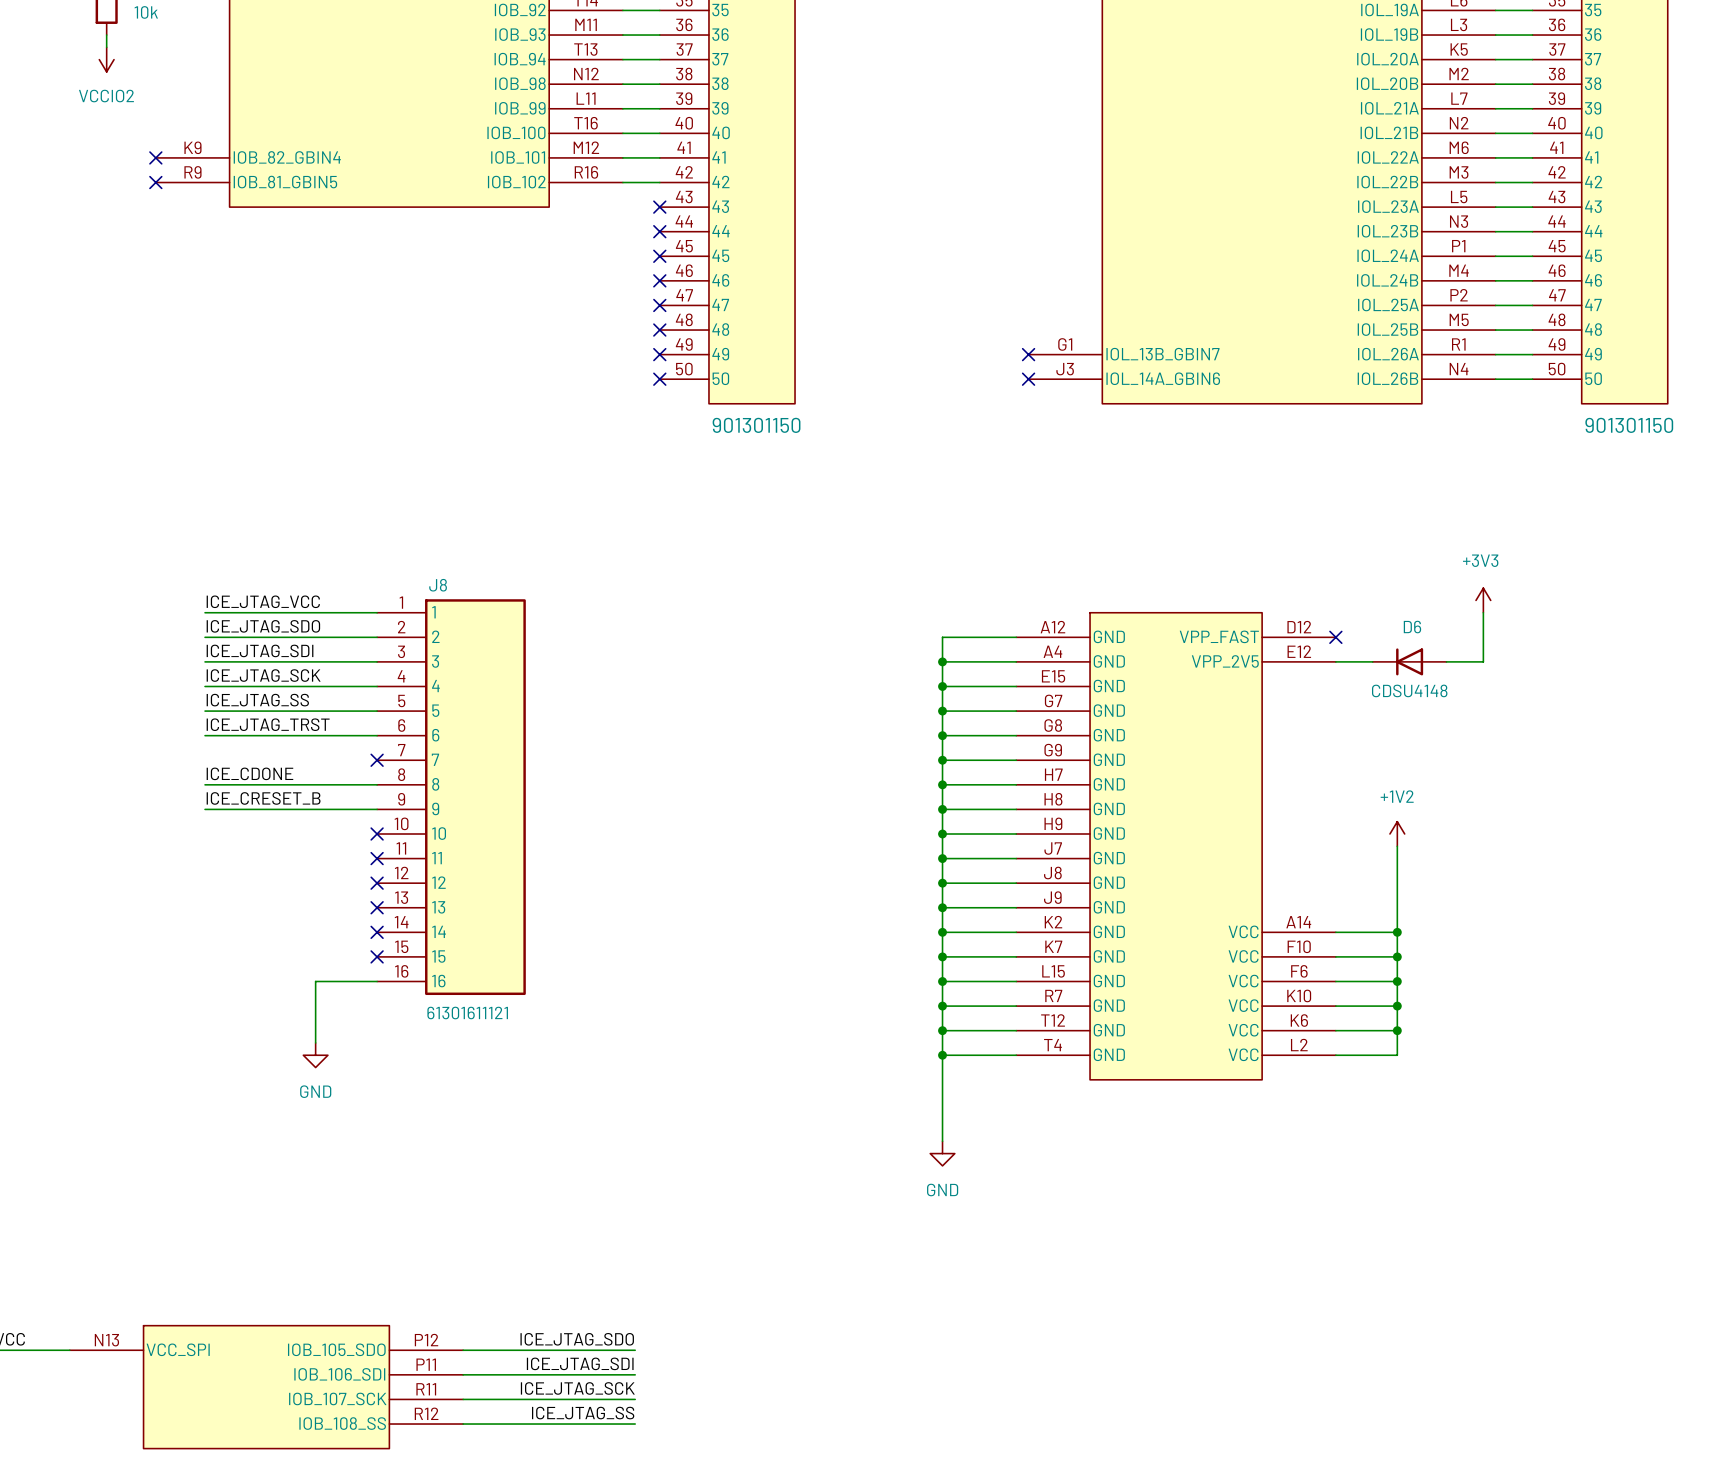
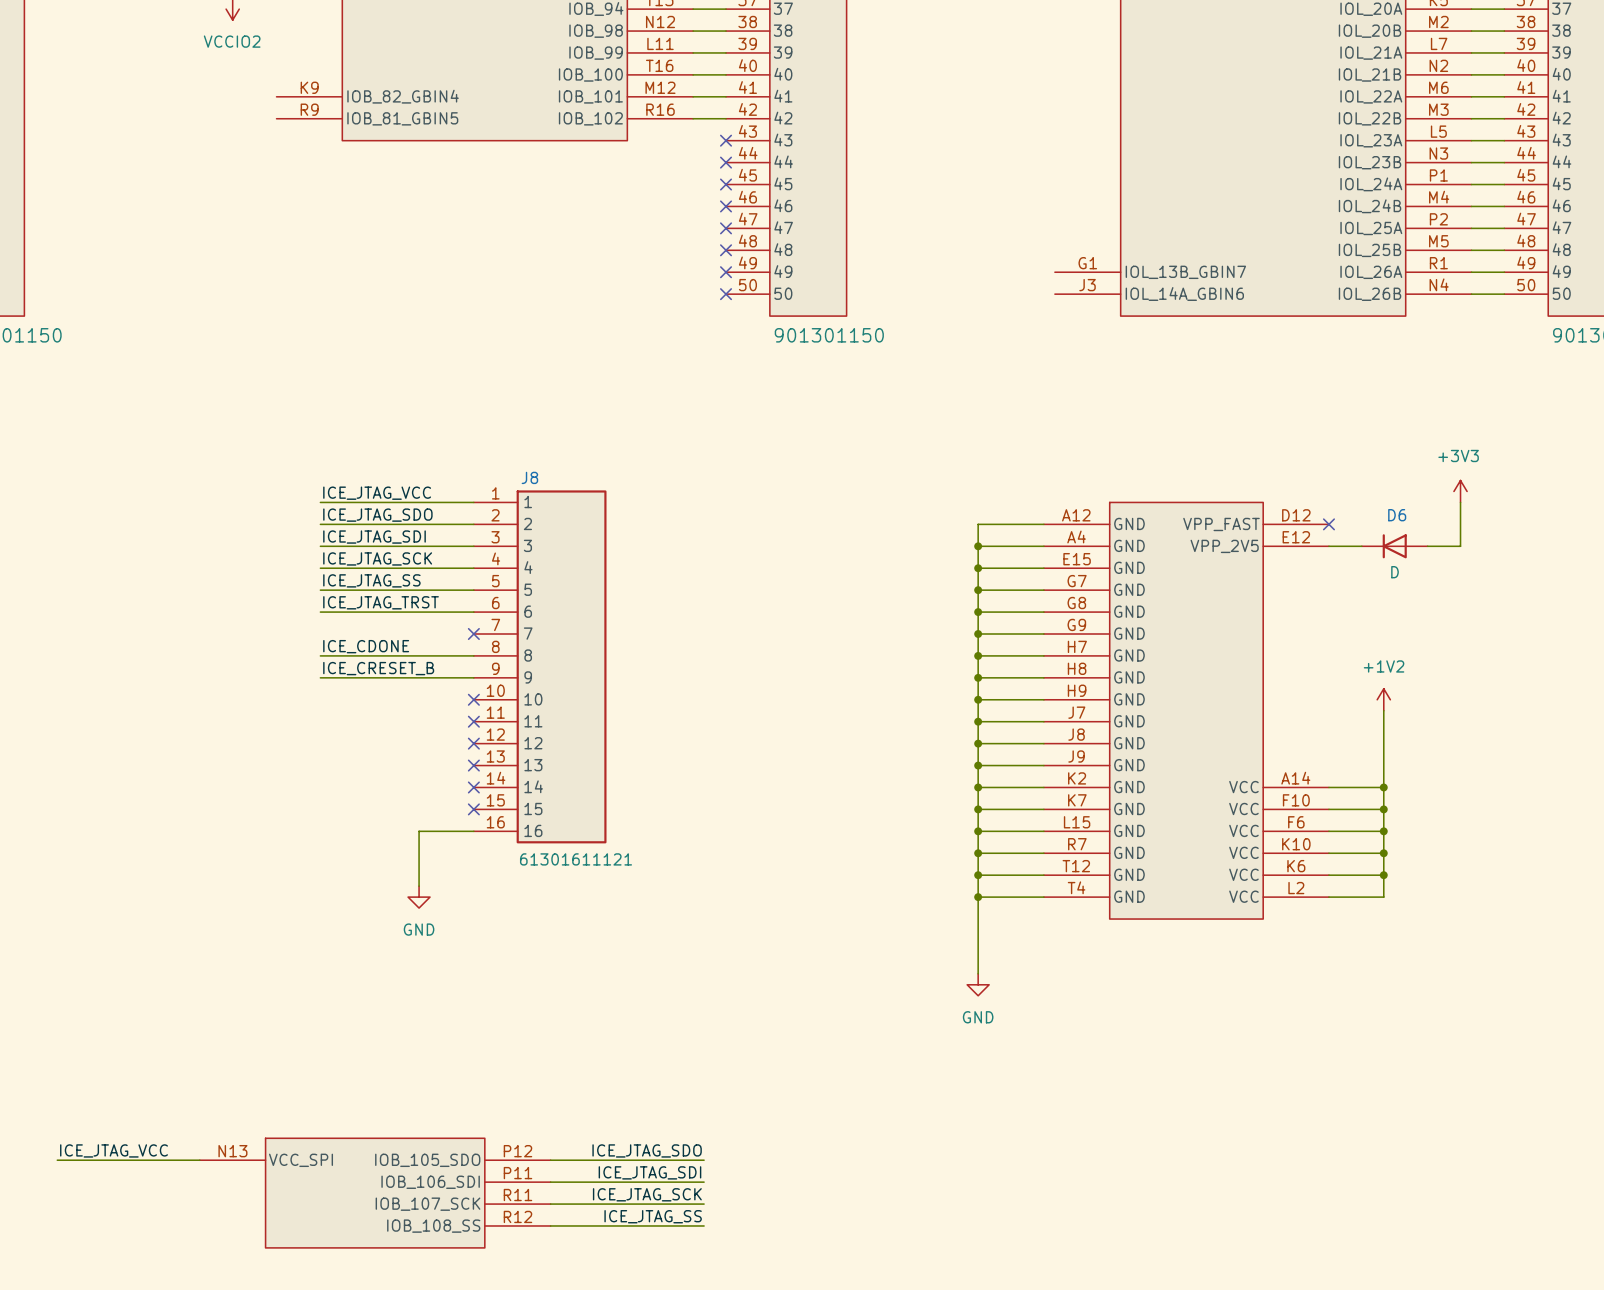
no-connect mark: (155, 157) -> none
no-connect mark: (155, 182) -> none
no-connect mark: (1028, 354) -> none
no-connect mark: (1028, 379) -> none
D6 value: CDSU4148 (1409, 690) -> D (1395, 572)

